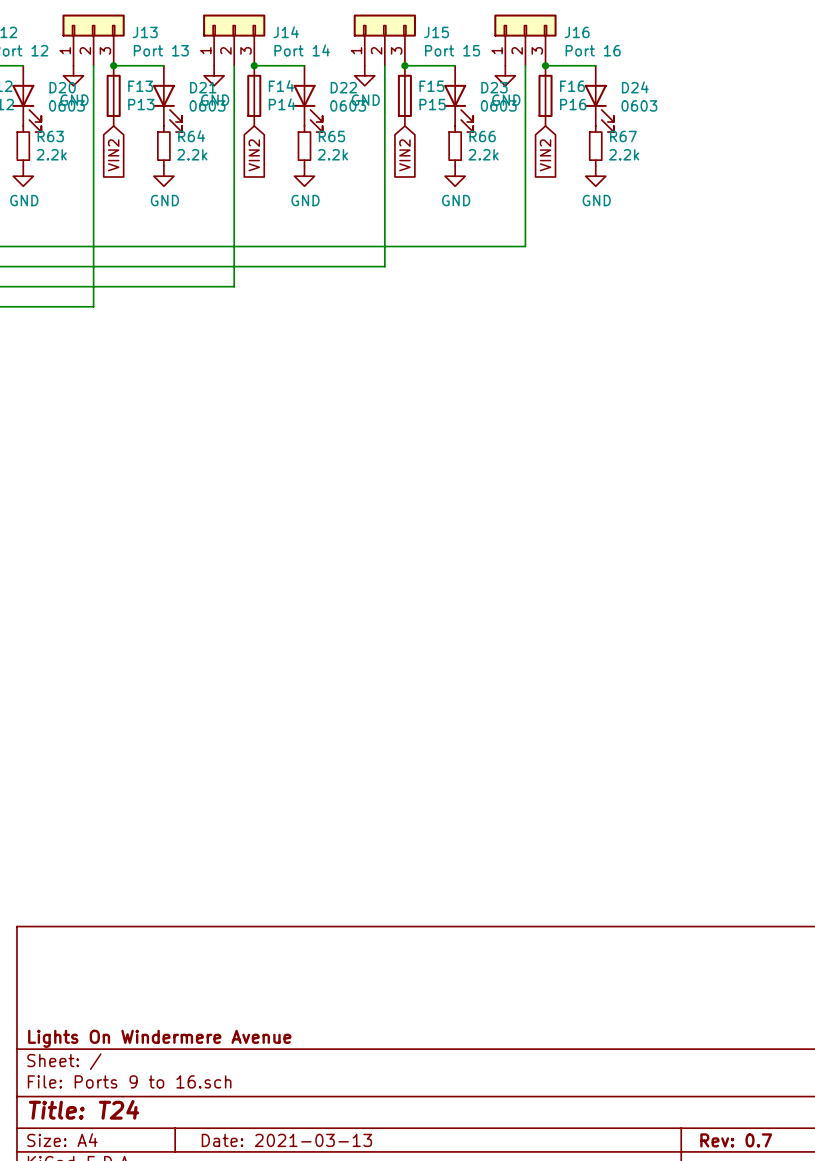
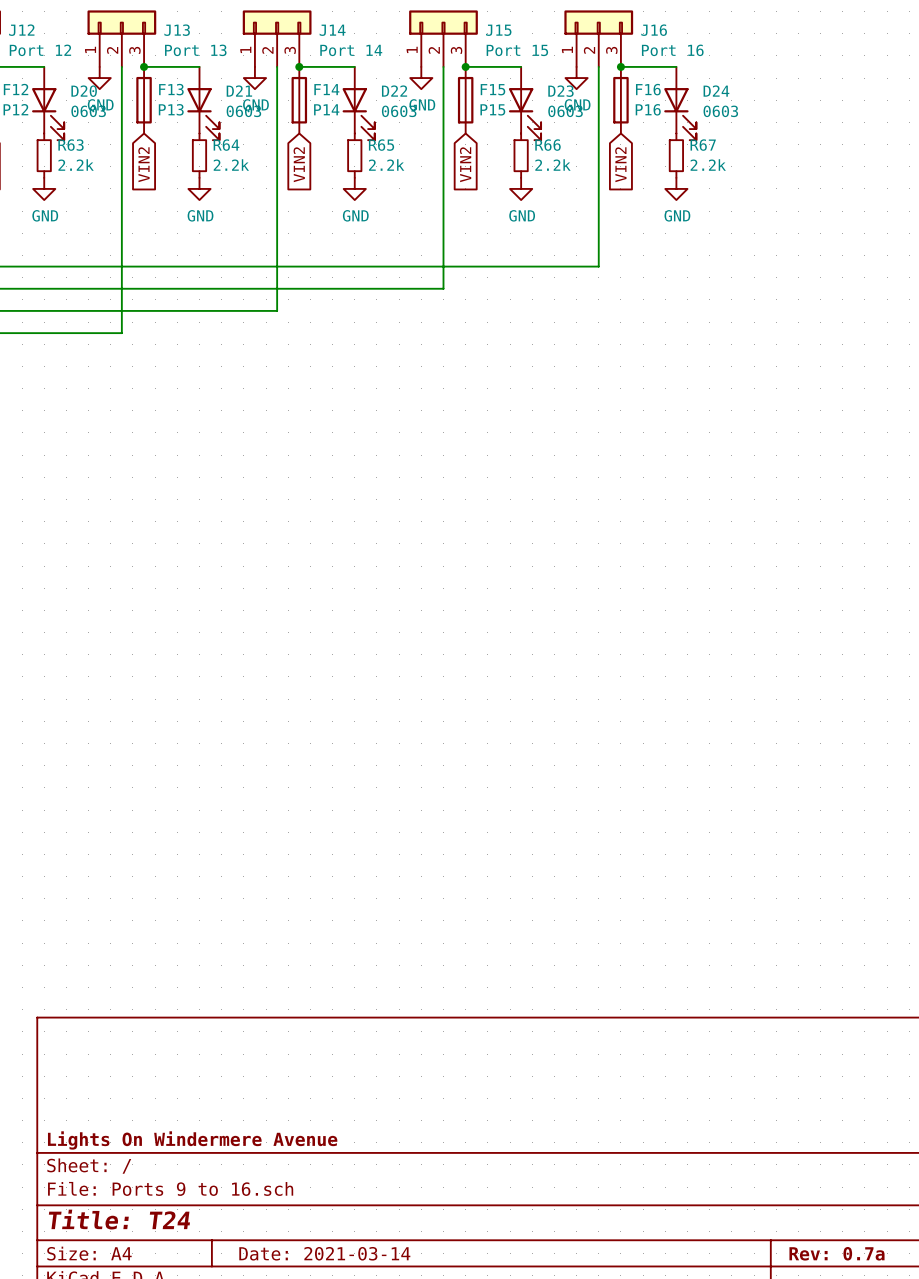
title block: Date: 2021-03-13 (286, 1140) -> Date: 2021-03-14 (324, 1253)
title block: Rev: 0.7 (736, 1140) -> Rev: 0.7a (836, 1253)

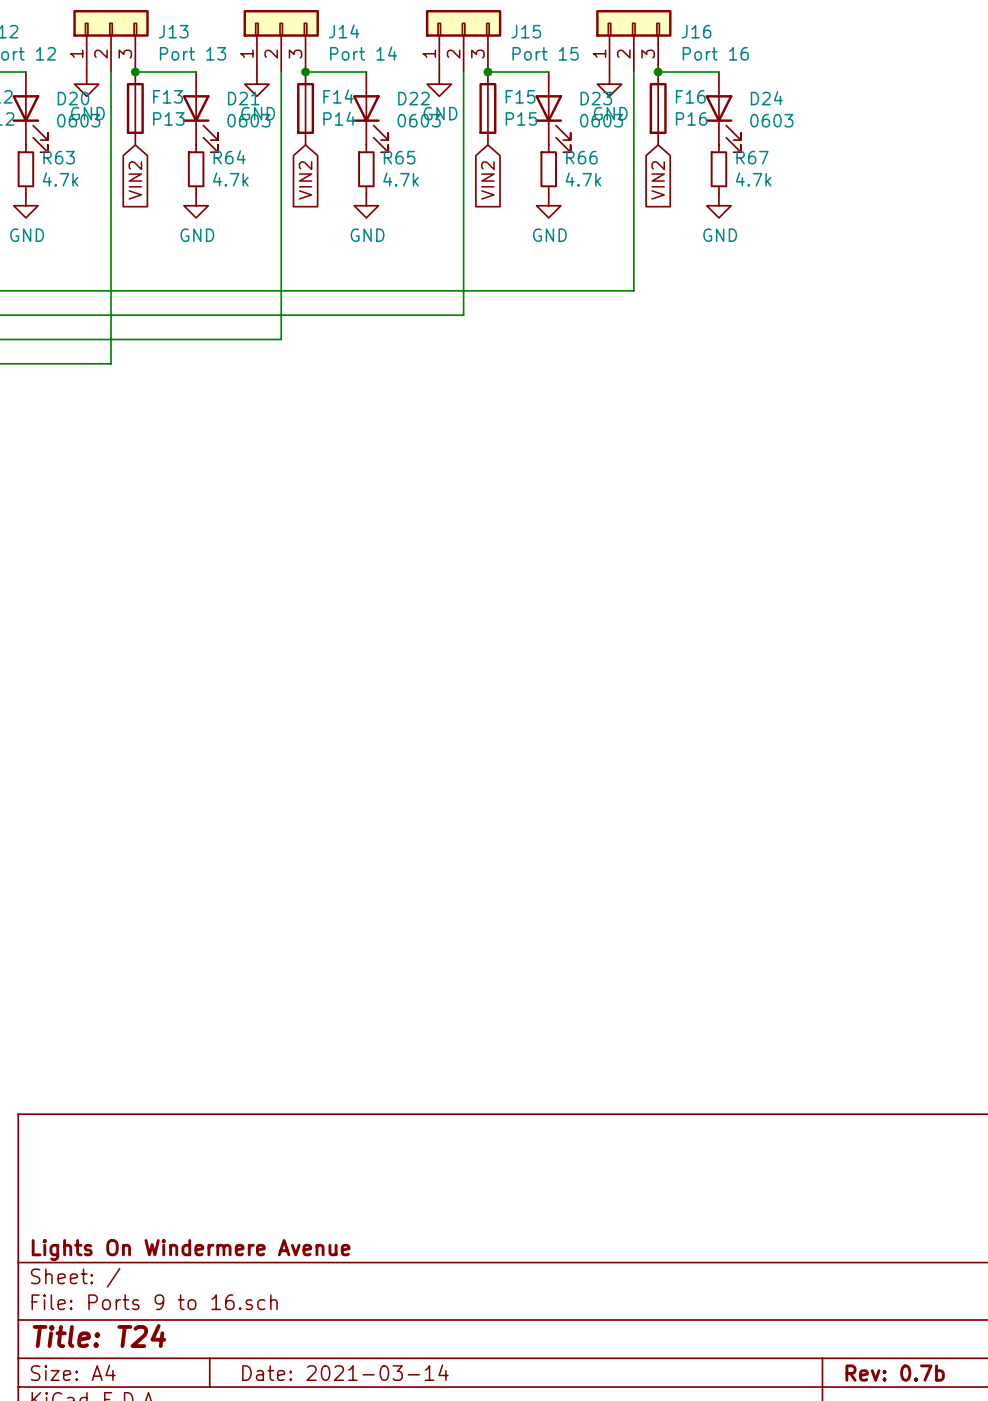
R63 value: 2.2k (76, 165) -> 4.7k (60, 179)
R64 value: 2.2k (231, 165) -> 4.7k (230, 179)
R65 value: 2.2k (386, 165) -> 4.7k (401, 179)
R66 value: 2.2k (552, 165) -> 4.7k (583, 179)
R67 value: 2.2k (708, 165) -> 4.7k (753, 179)
title block: Rev: 0.7a (836, 1253) -> Rev: 0.7b (895, 1373)

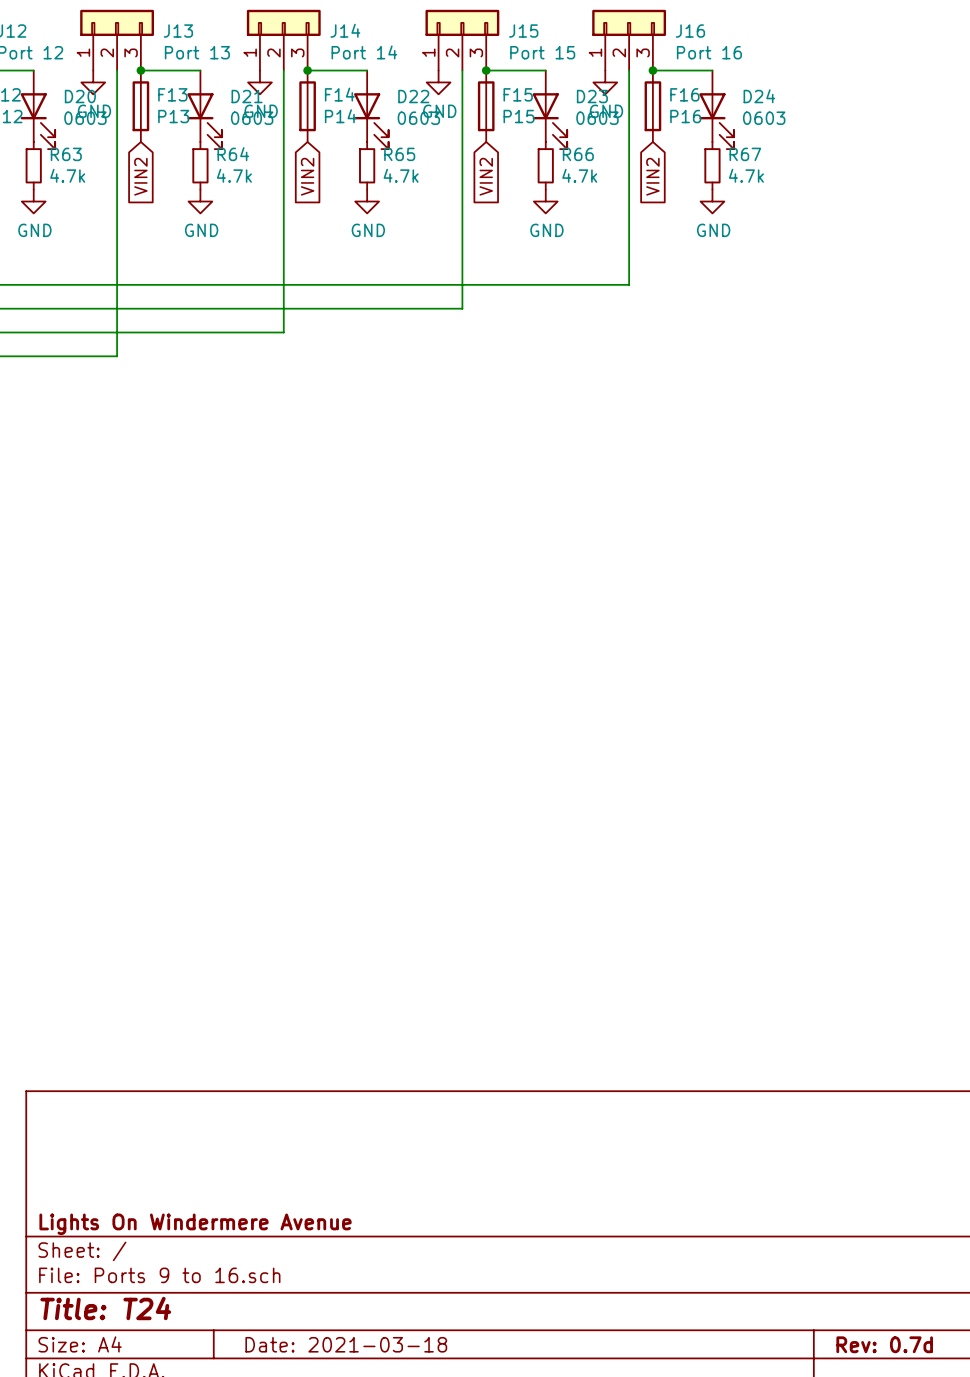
title block: Date: 2021-03-14 (345, 1372) -> Date: 2021-03-18 (346, 1344)
title block: Rev: 0.7b (895, 1373) -> Rev: 0.7d (884, 1344)

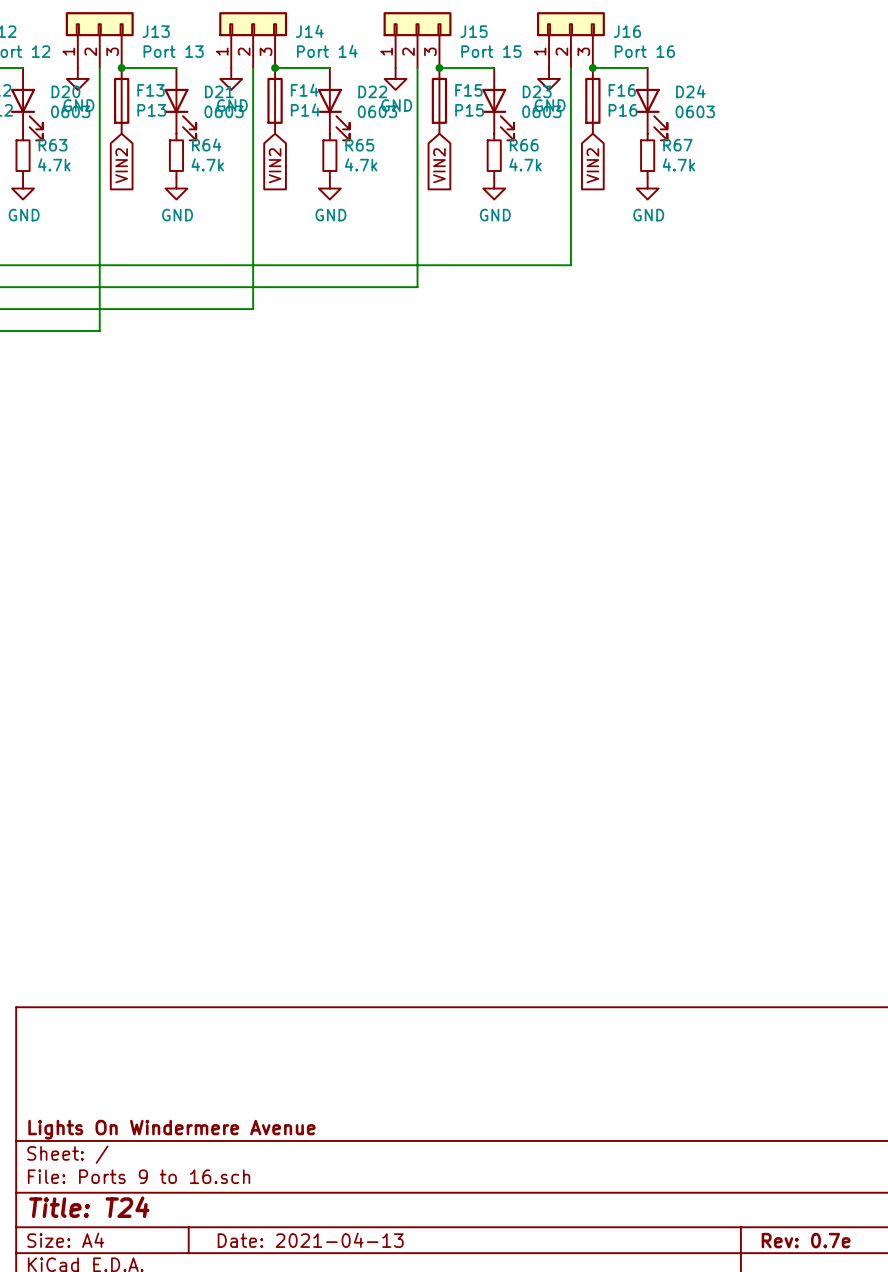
title block: Date: 2021-03-18 (346, 1344) -> Date: 2021-04-13 (310, 1240)
title block: Rev: 0.7d (884, 1344) -> Rev: 0.7e (806, 1240)

